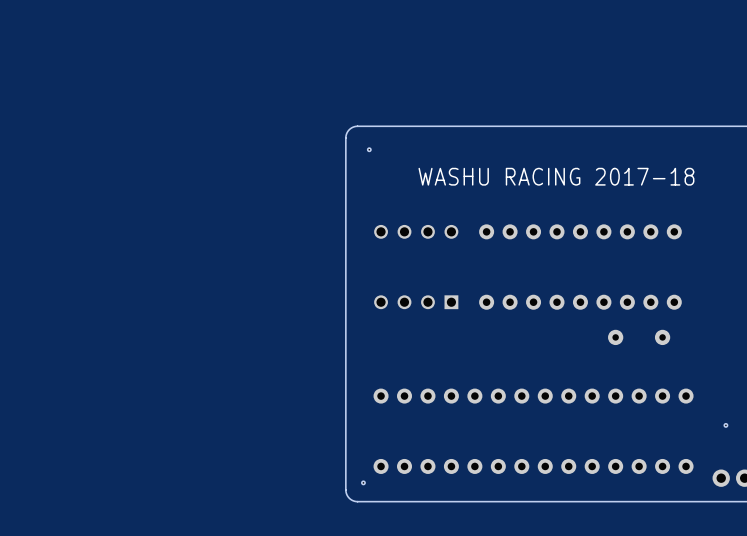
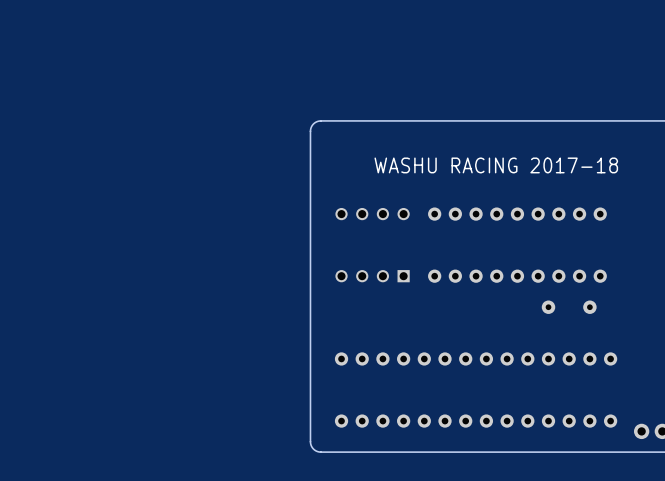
hole: (369, 149) -> none
hole: (725, 425) -> none
hole: (363, 482) -> none

